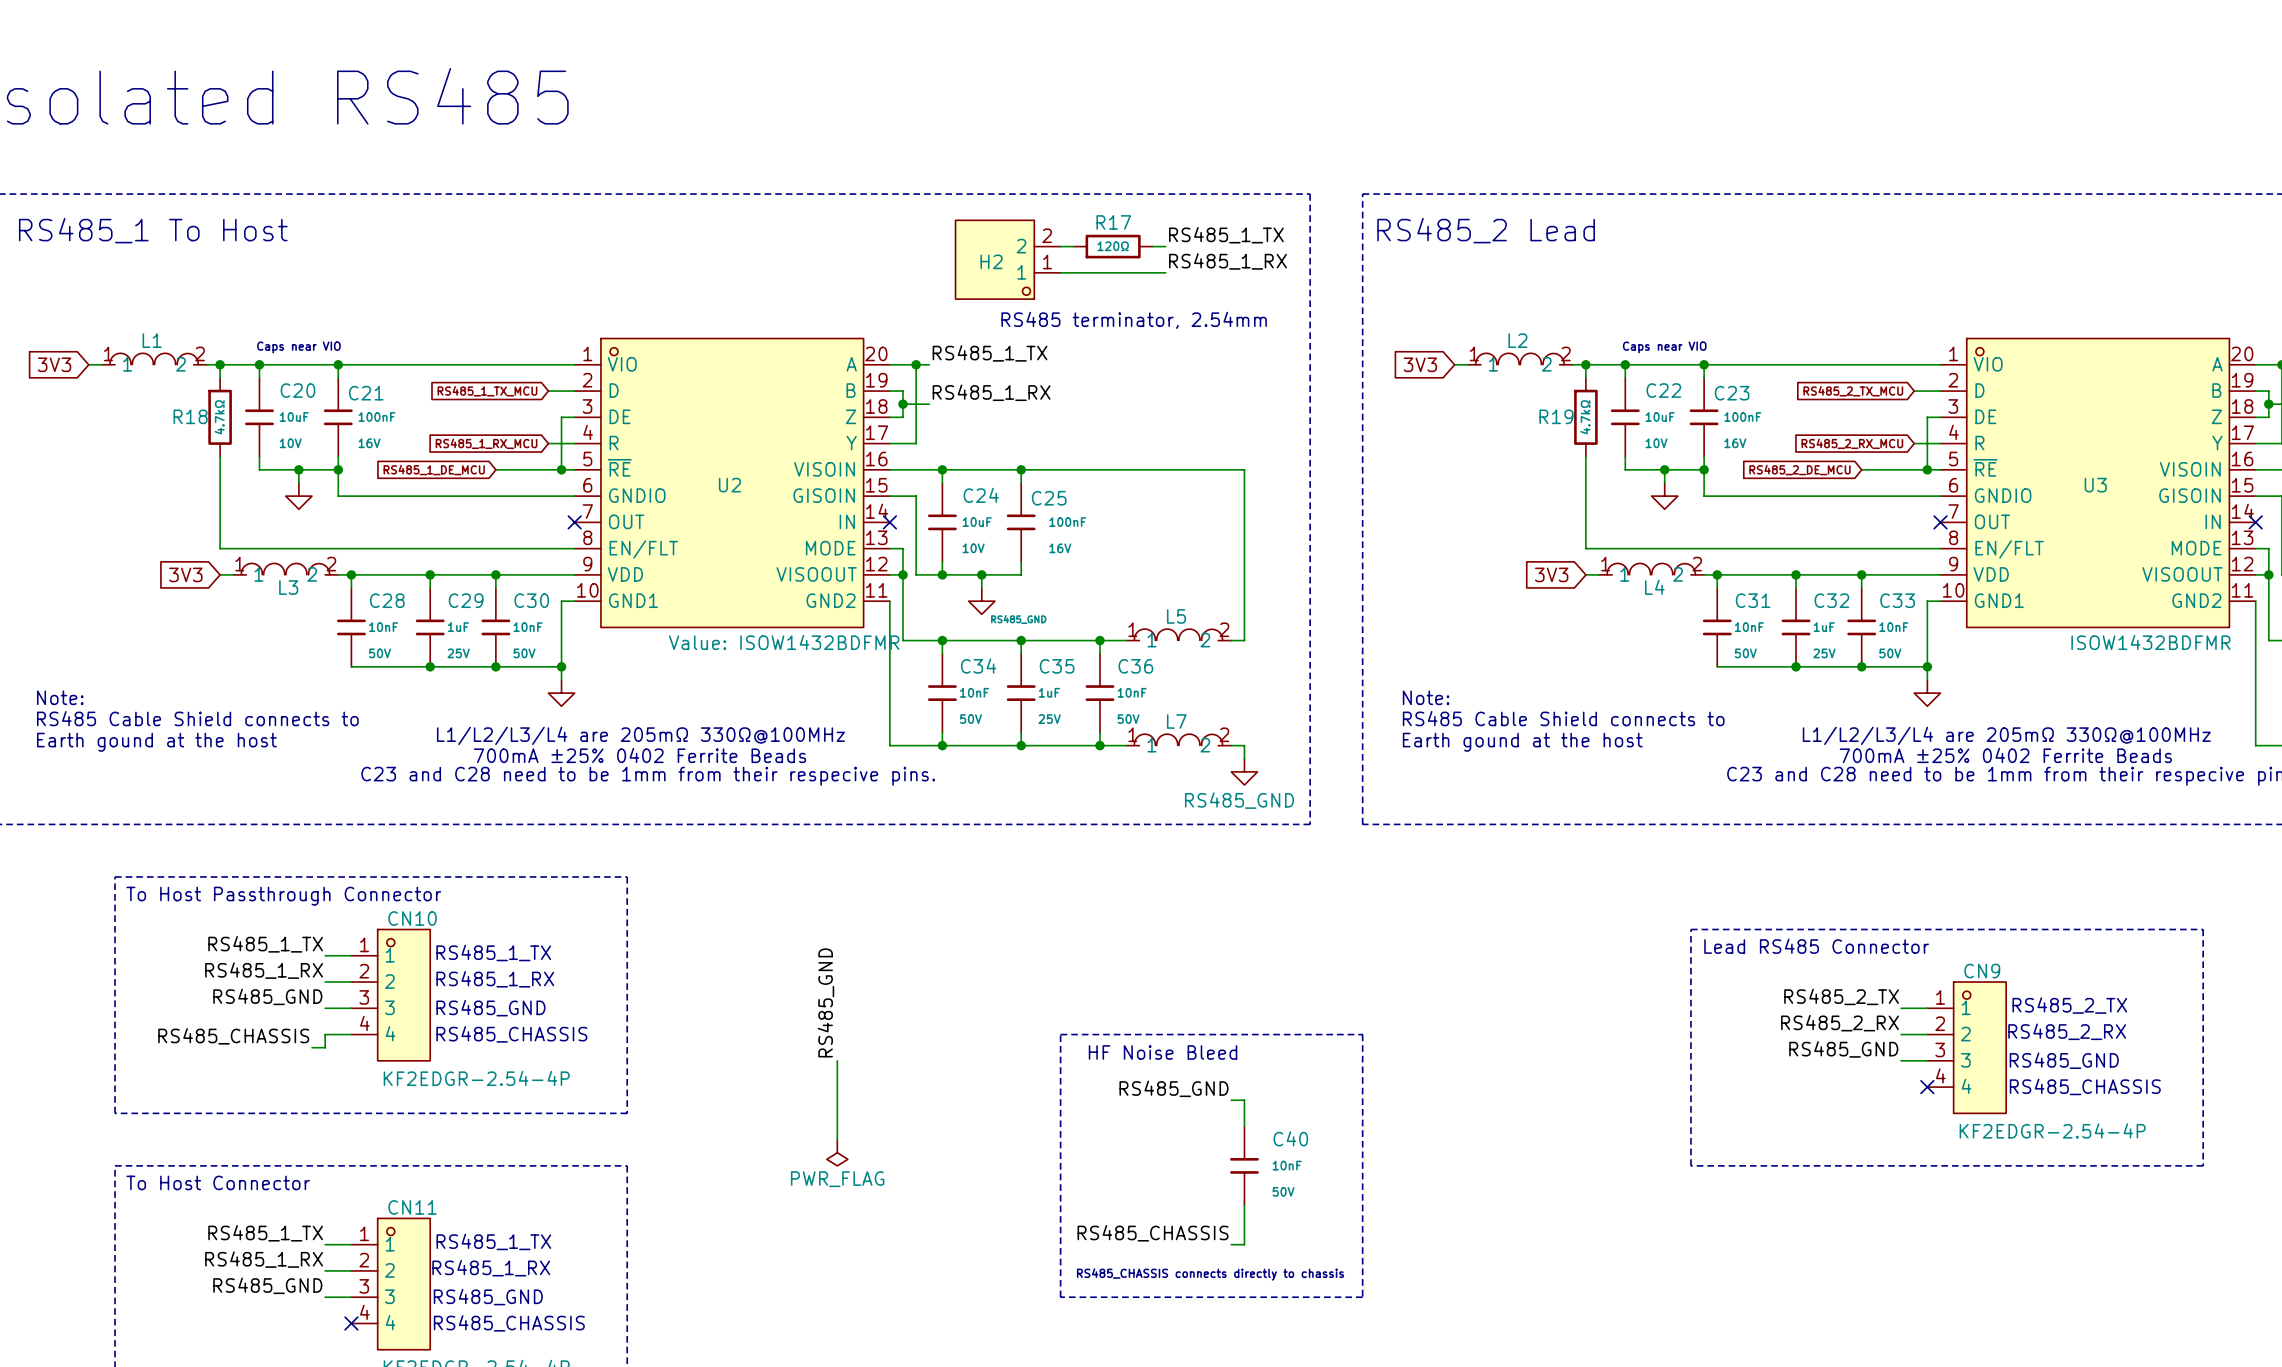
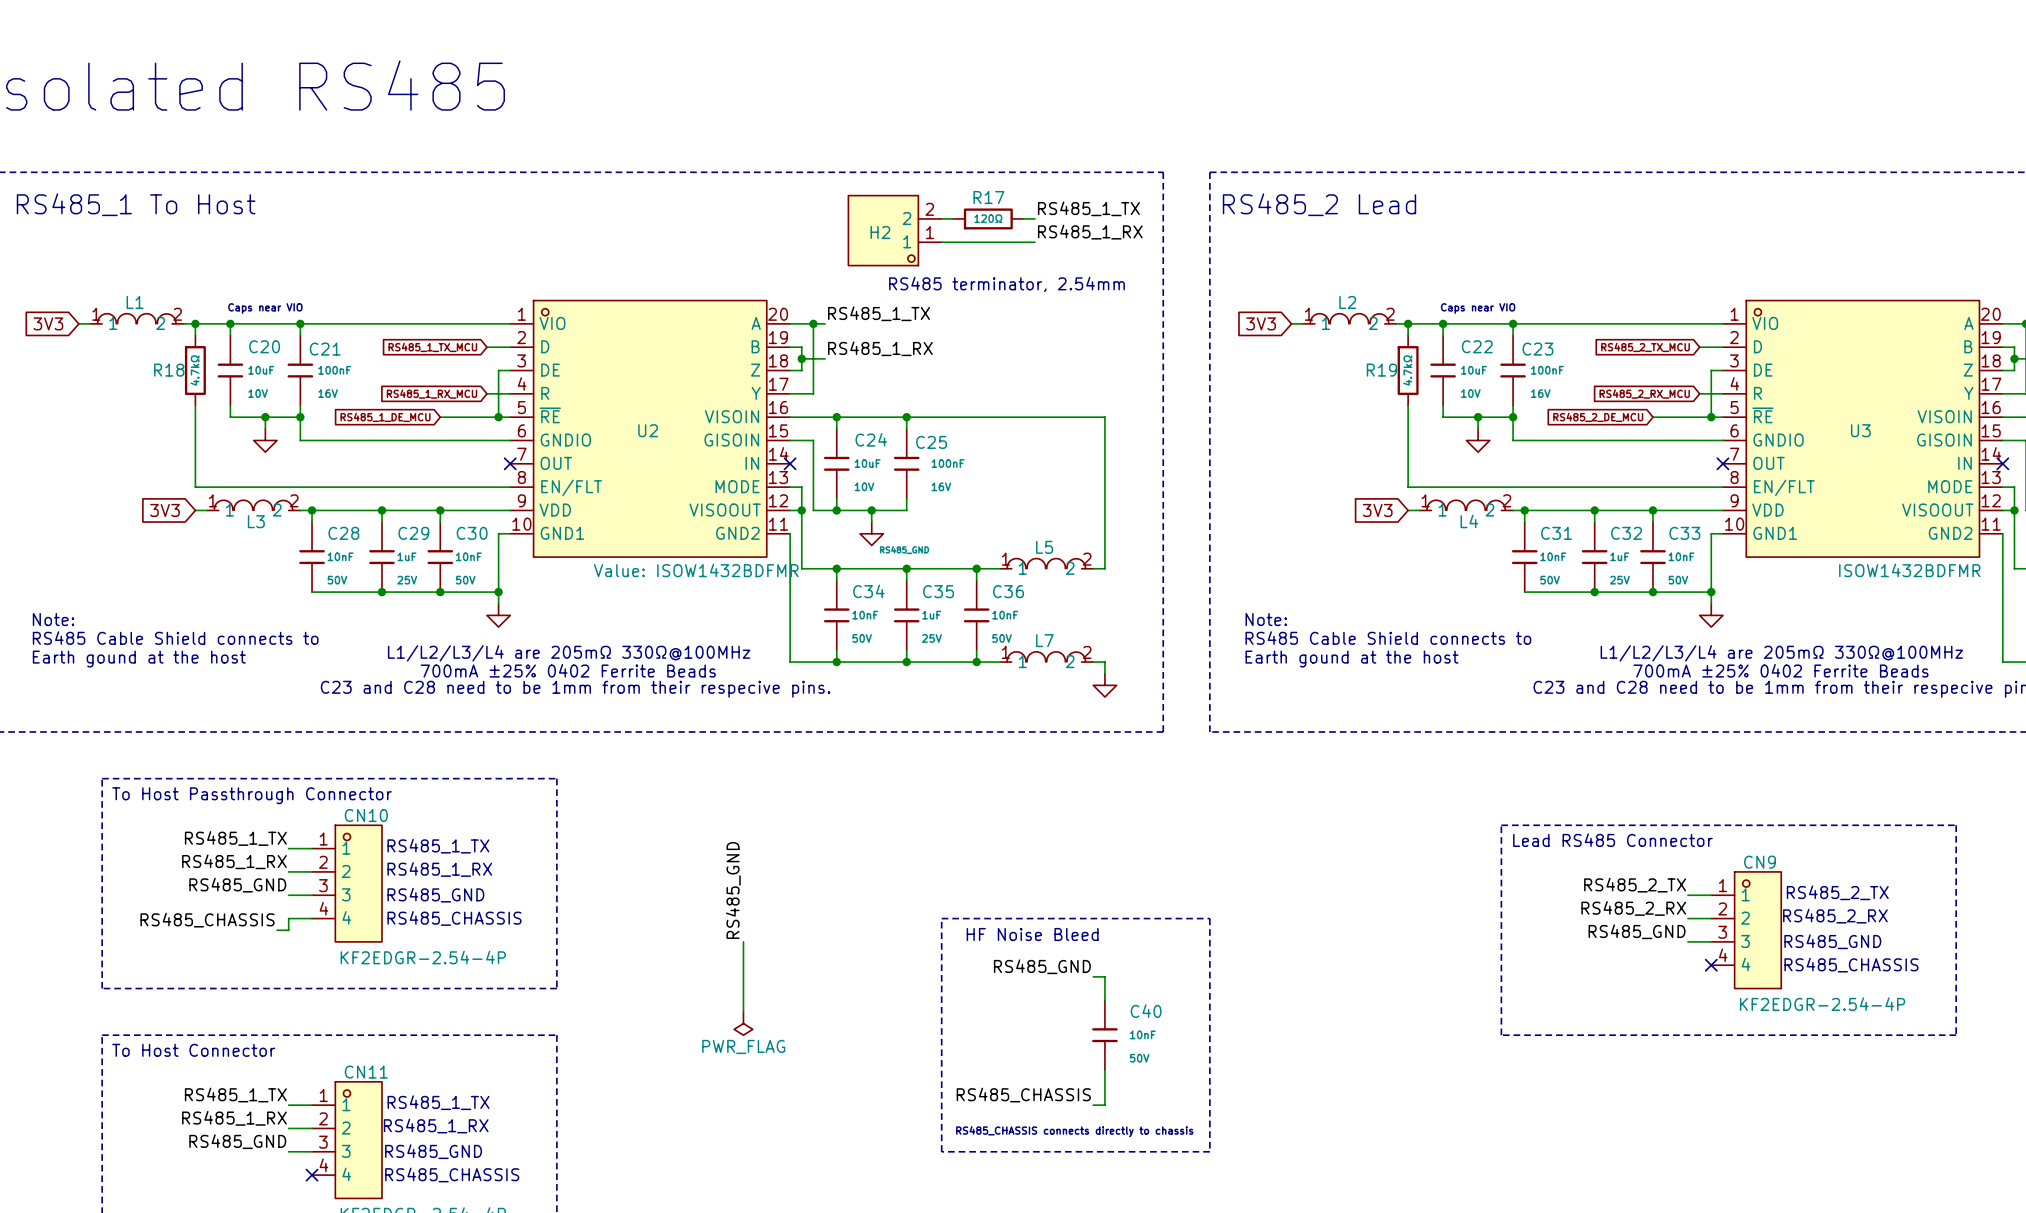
power symbol text: RS485_GND (1239, 800) -> none

